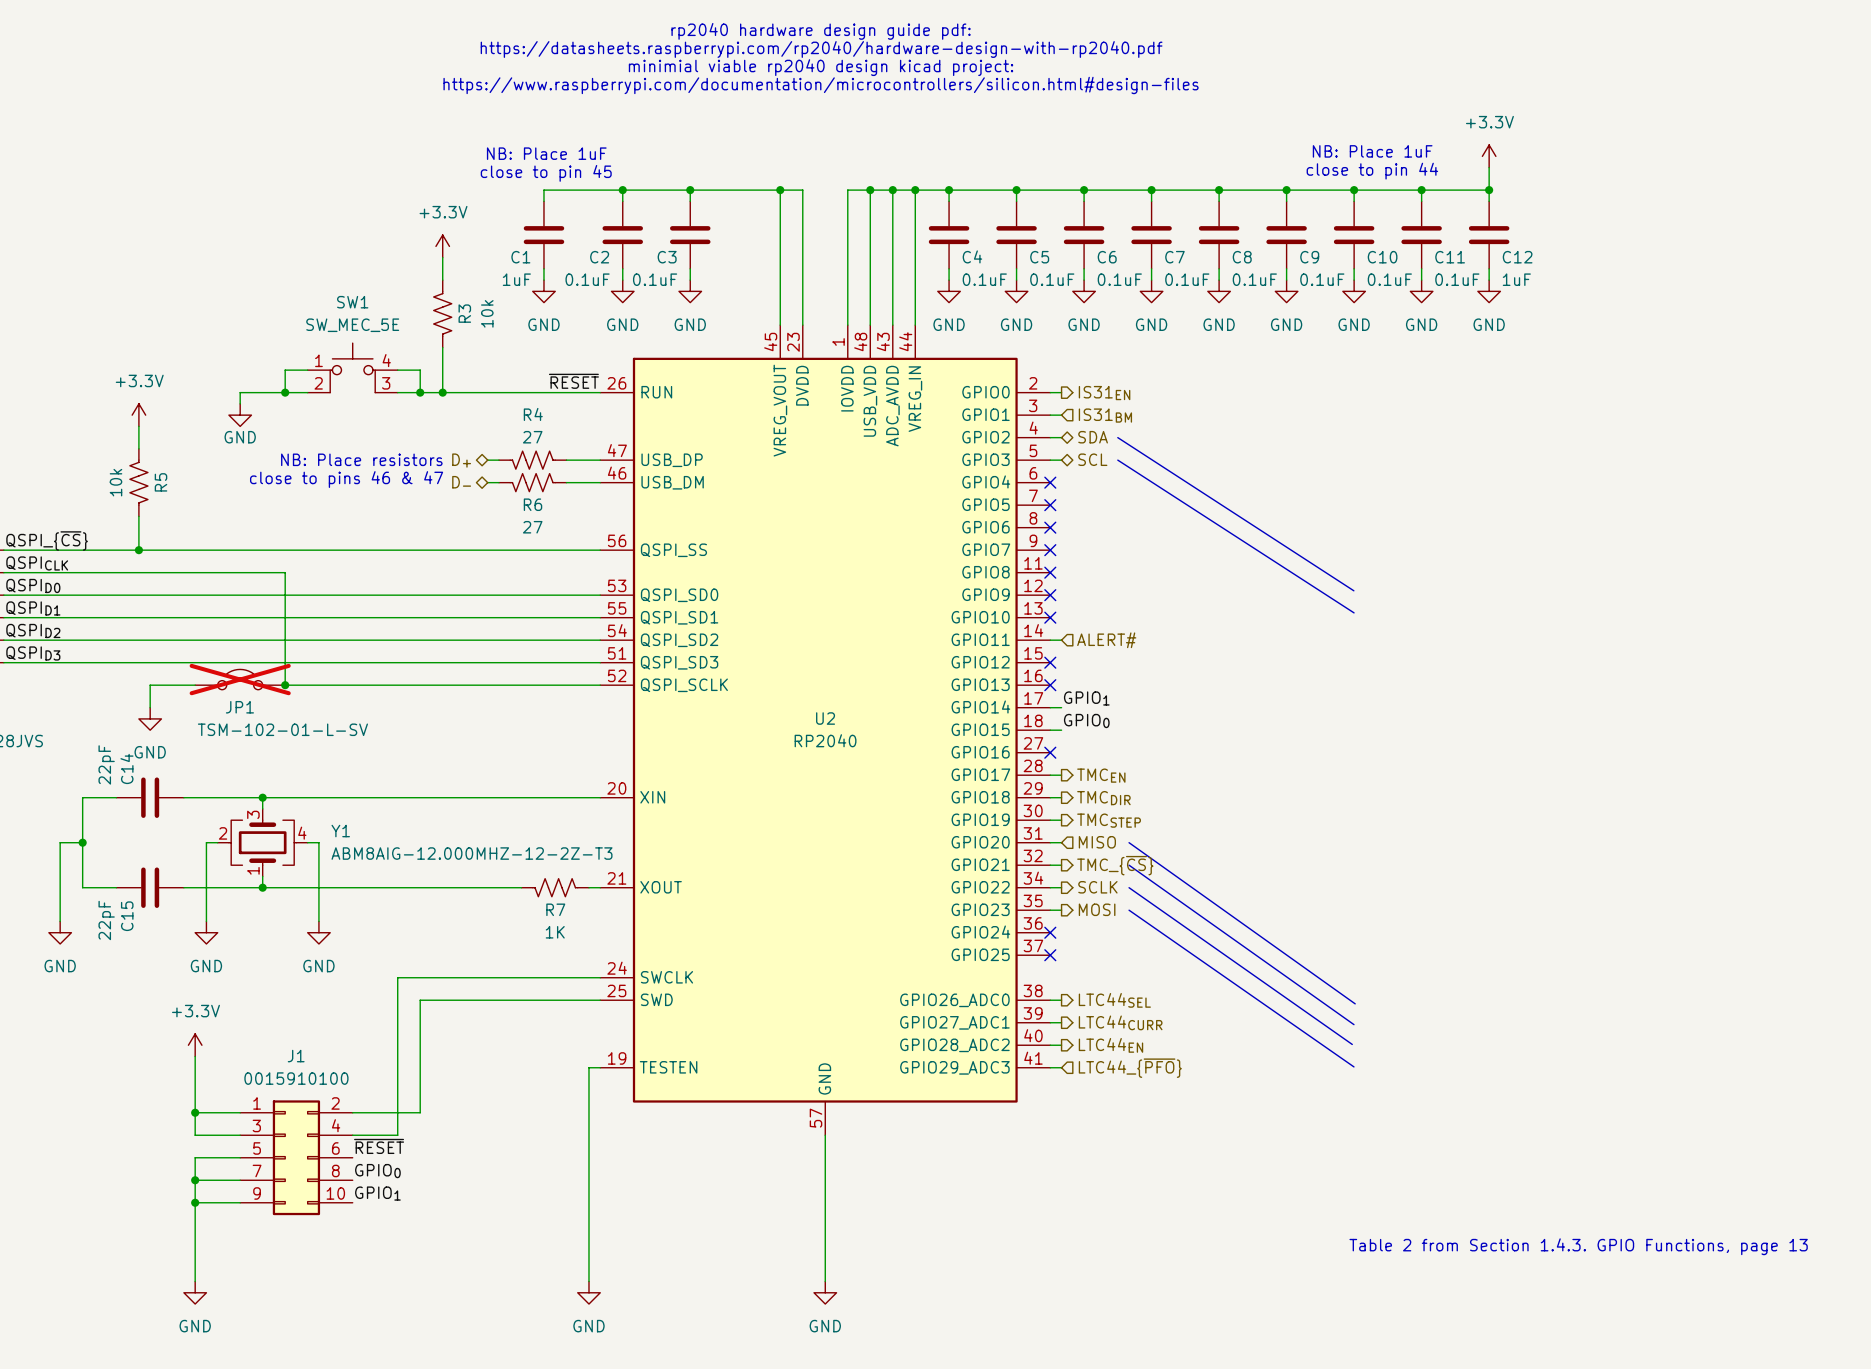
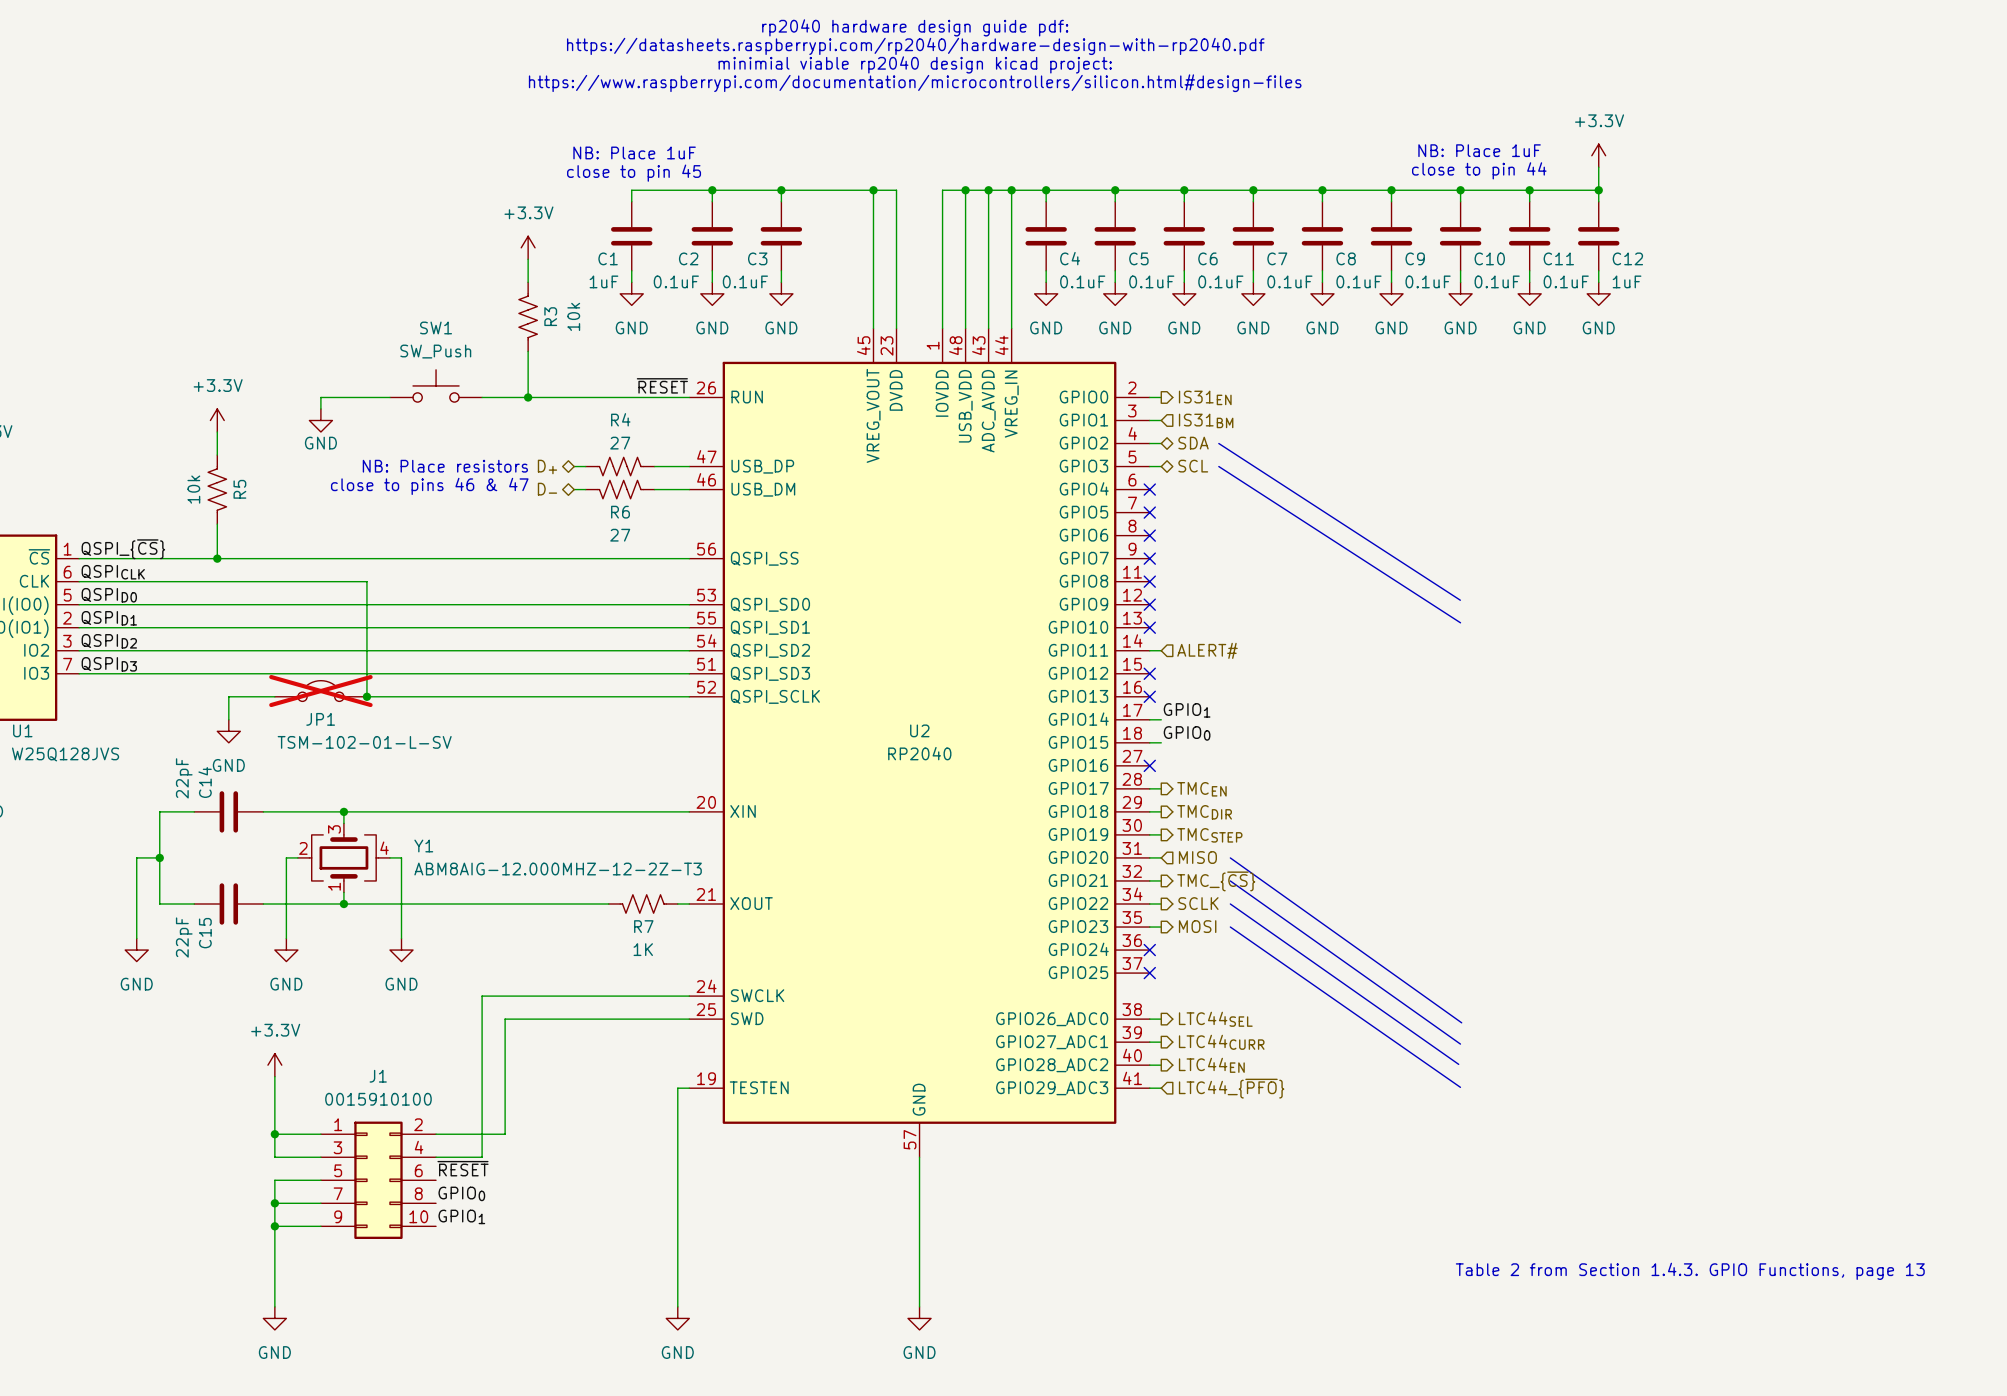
SW1 value: SW_MEC_5E (352, 325) -> SW_Push (435, 351)
SW1 symbol: [307, 343, 398, 393] -> [389, 369, 483, 403]
wire: (307, 370) (285, 370) (285, 392) -> none
wire: (397, 370) (420, 370) (420, 392) -> none
junction: (285, 392) -> none
junction: (420, 392) -> none

